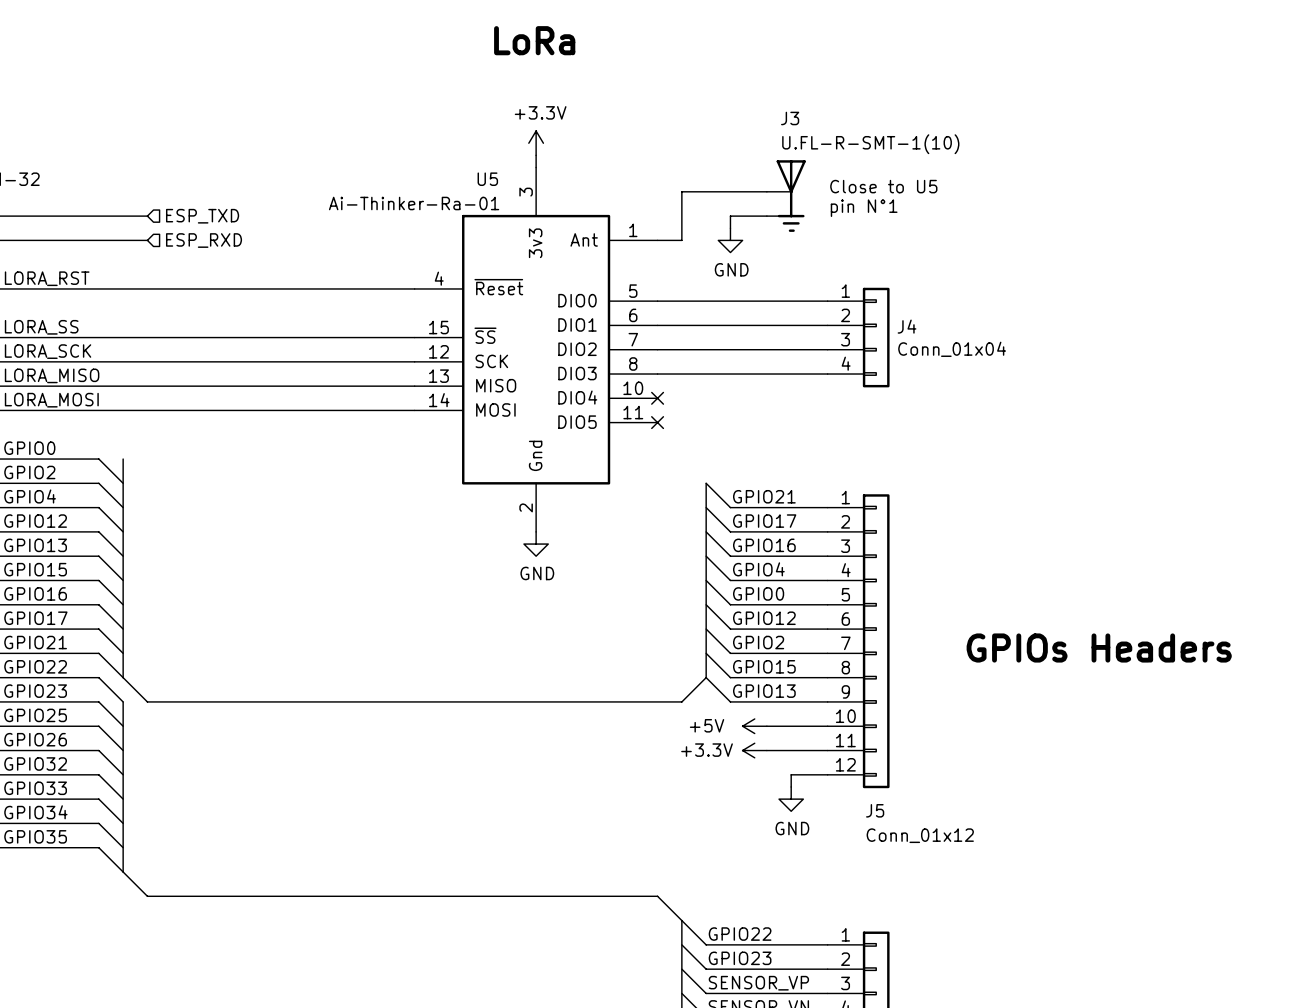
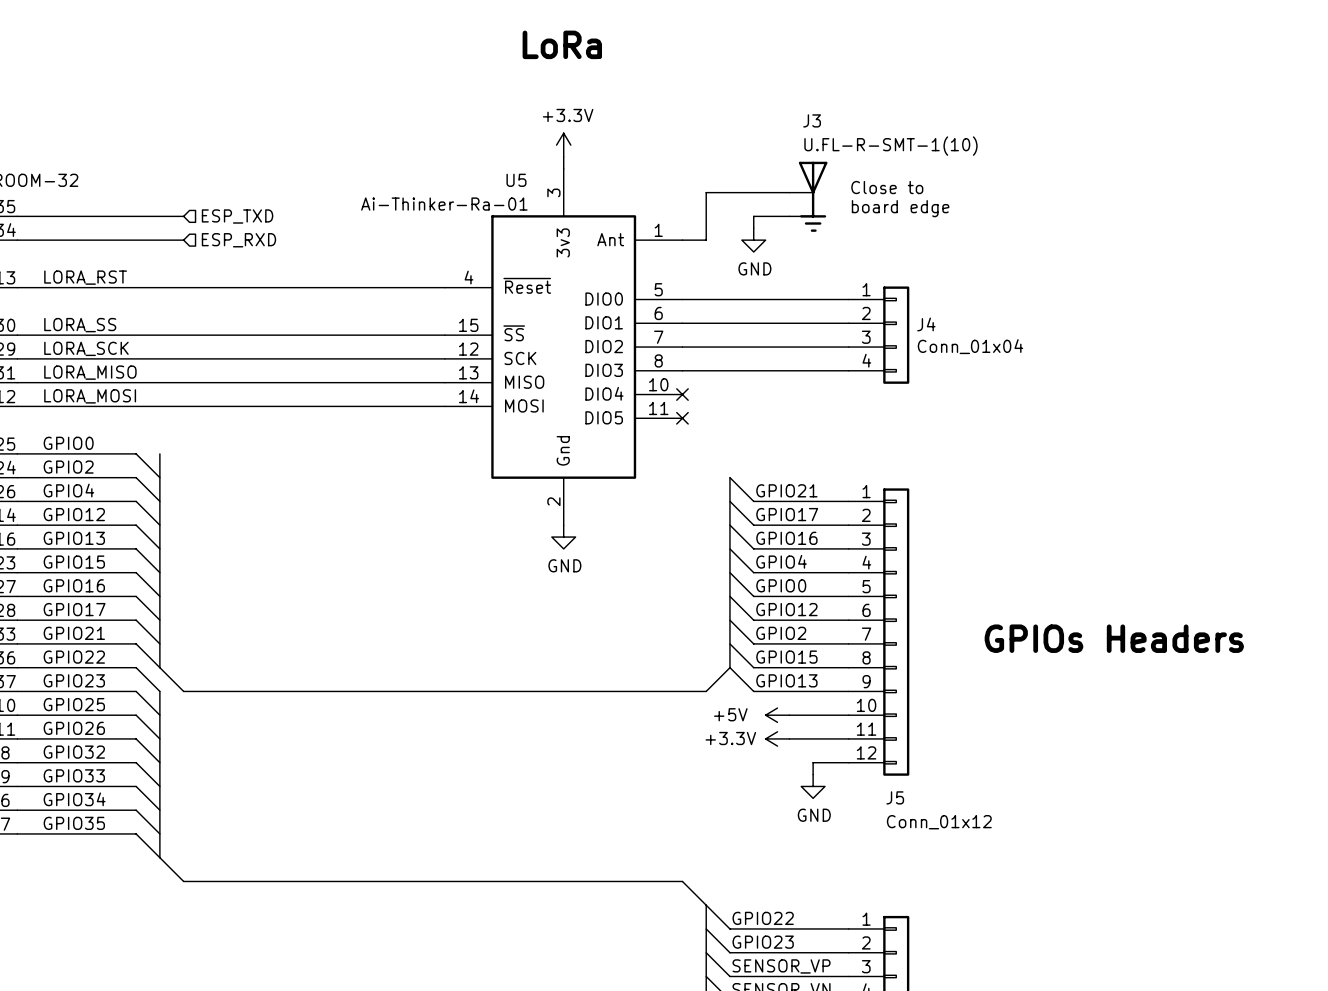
text: Close to U5 (883, 186) -> Close to (887, 187)
text: pin N°1 (864, 208) -> board edge (900, 208)

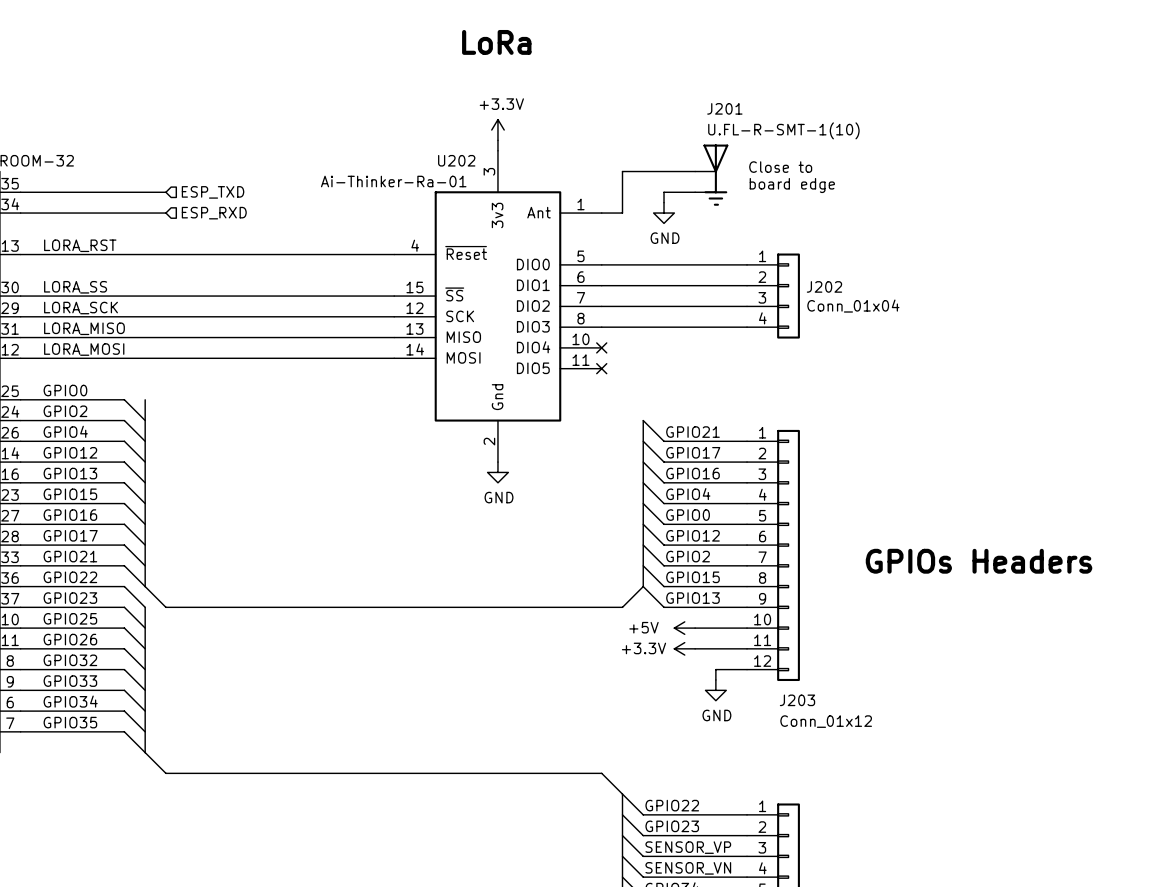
J3 name: J3 (812, 120) -> J201 (724, 108)
U5 name: U5 (516, 180) -> U202 (456, 160)
J4 name: J4 (926, 324) -> J202 (824, 286)
J5 name: J5 (895, 797) -> J203 (797, 700)

